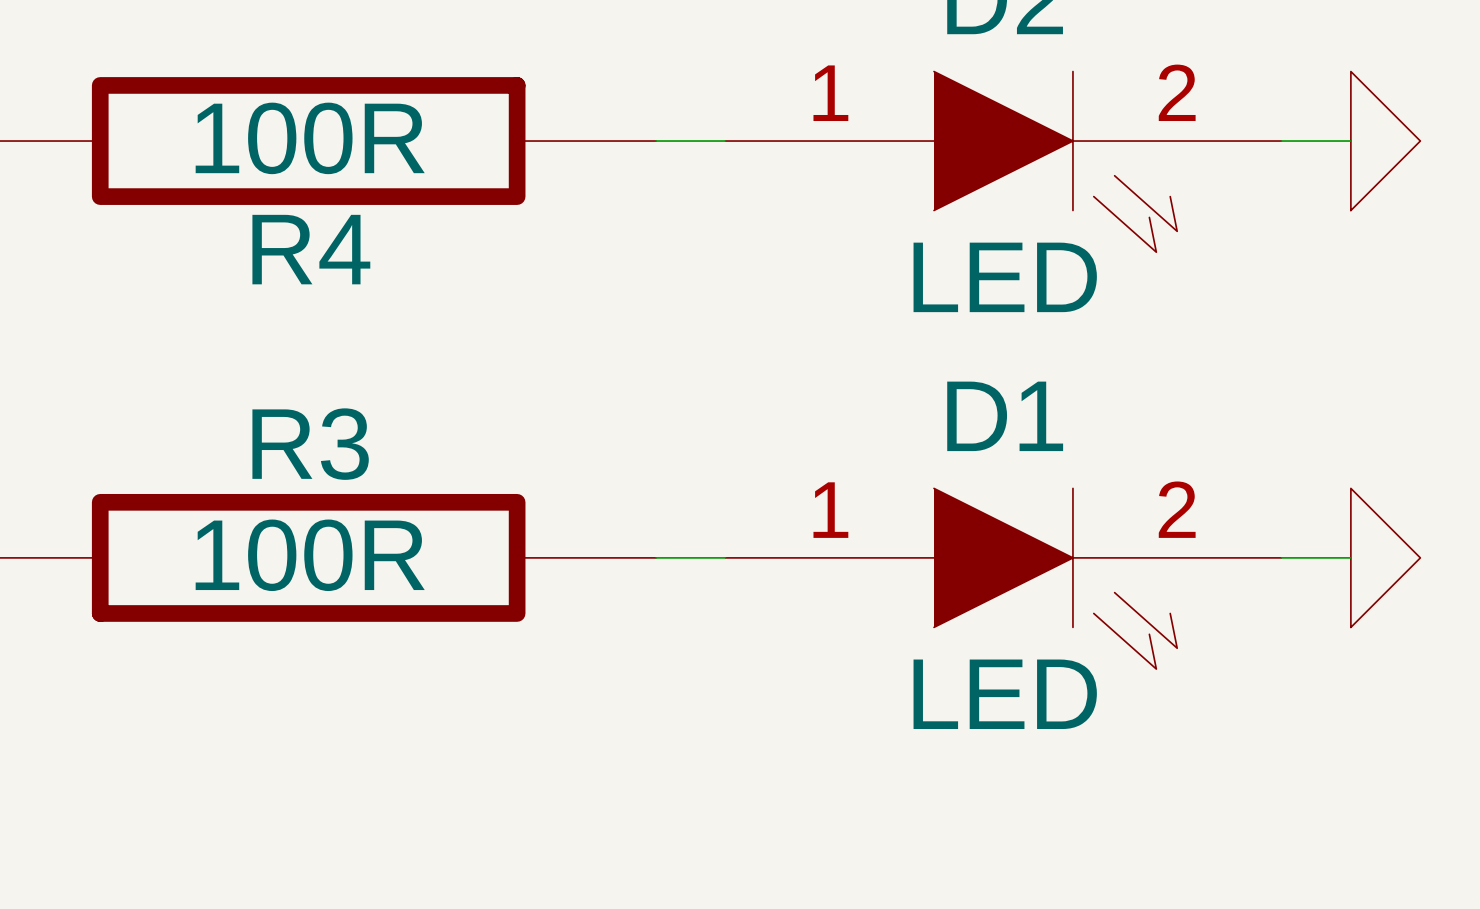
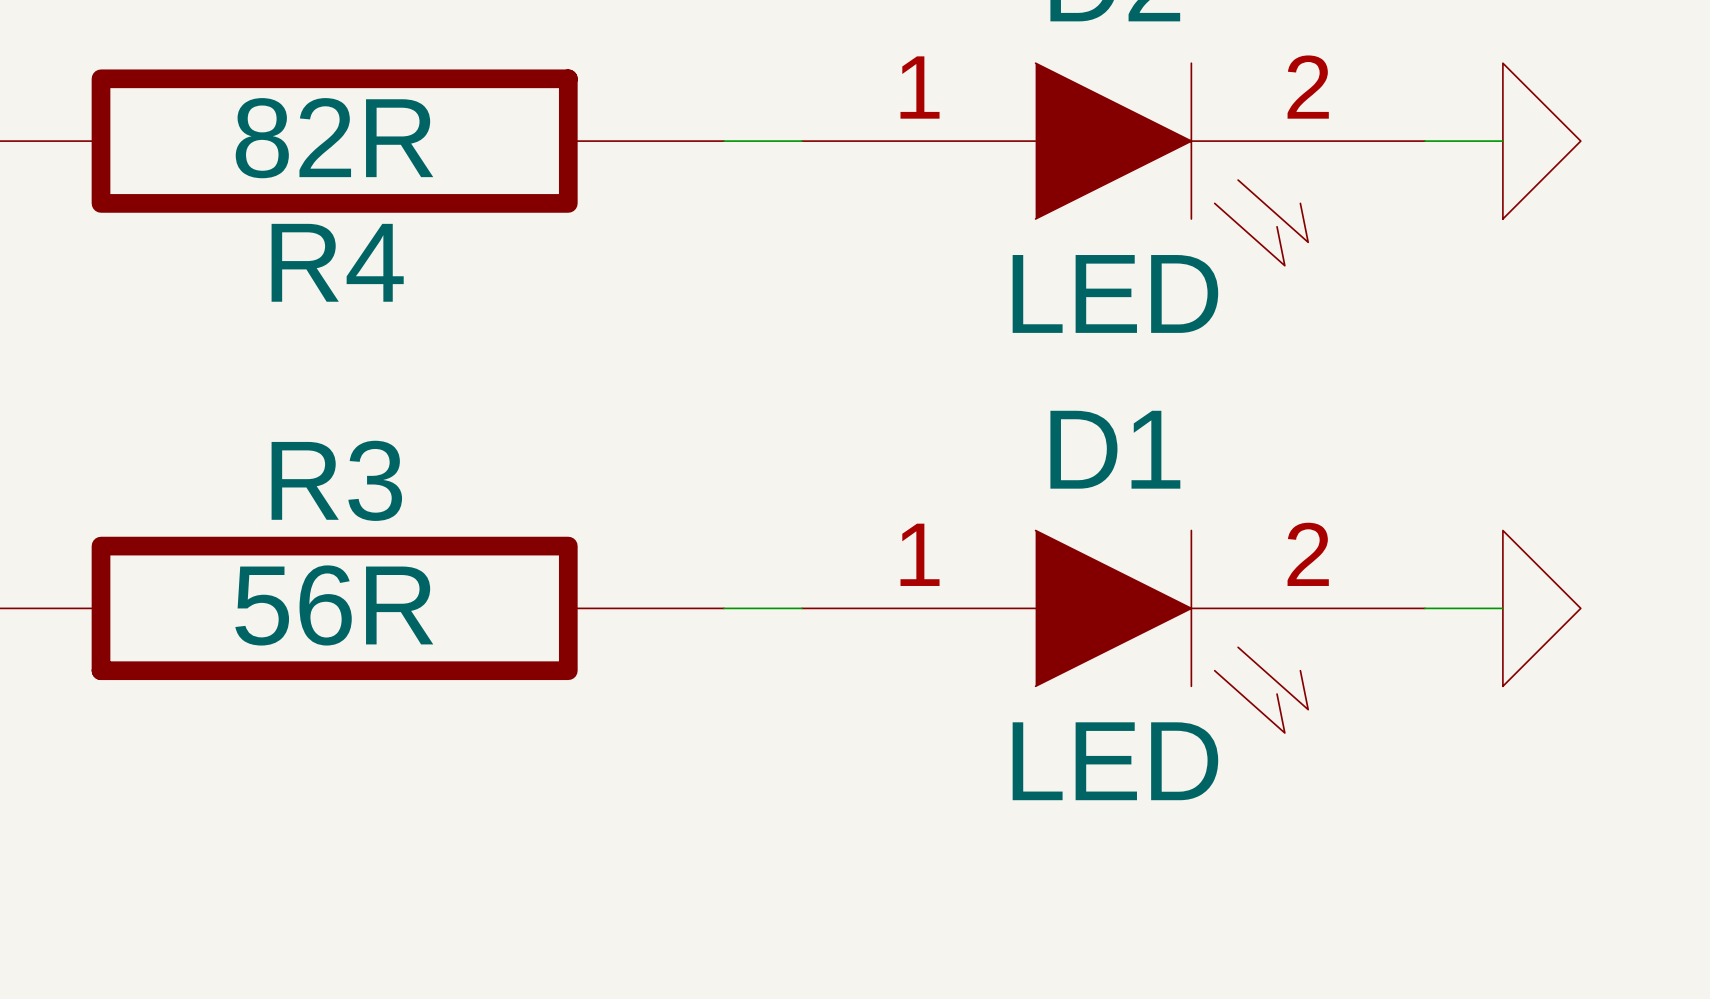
R4 value: 100R (310, 138) -> 82R (334, 138)
R3 value: 100R (310, 555) -> 56R (334, 605)

